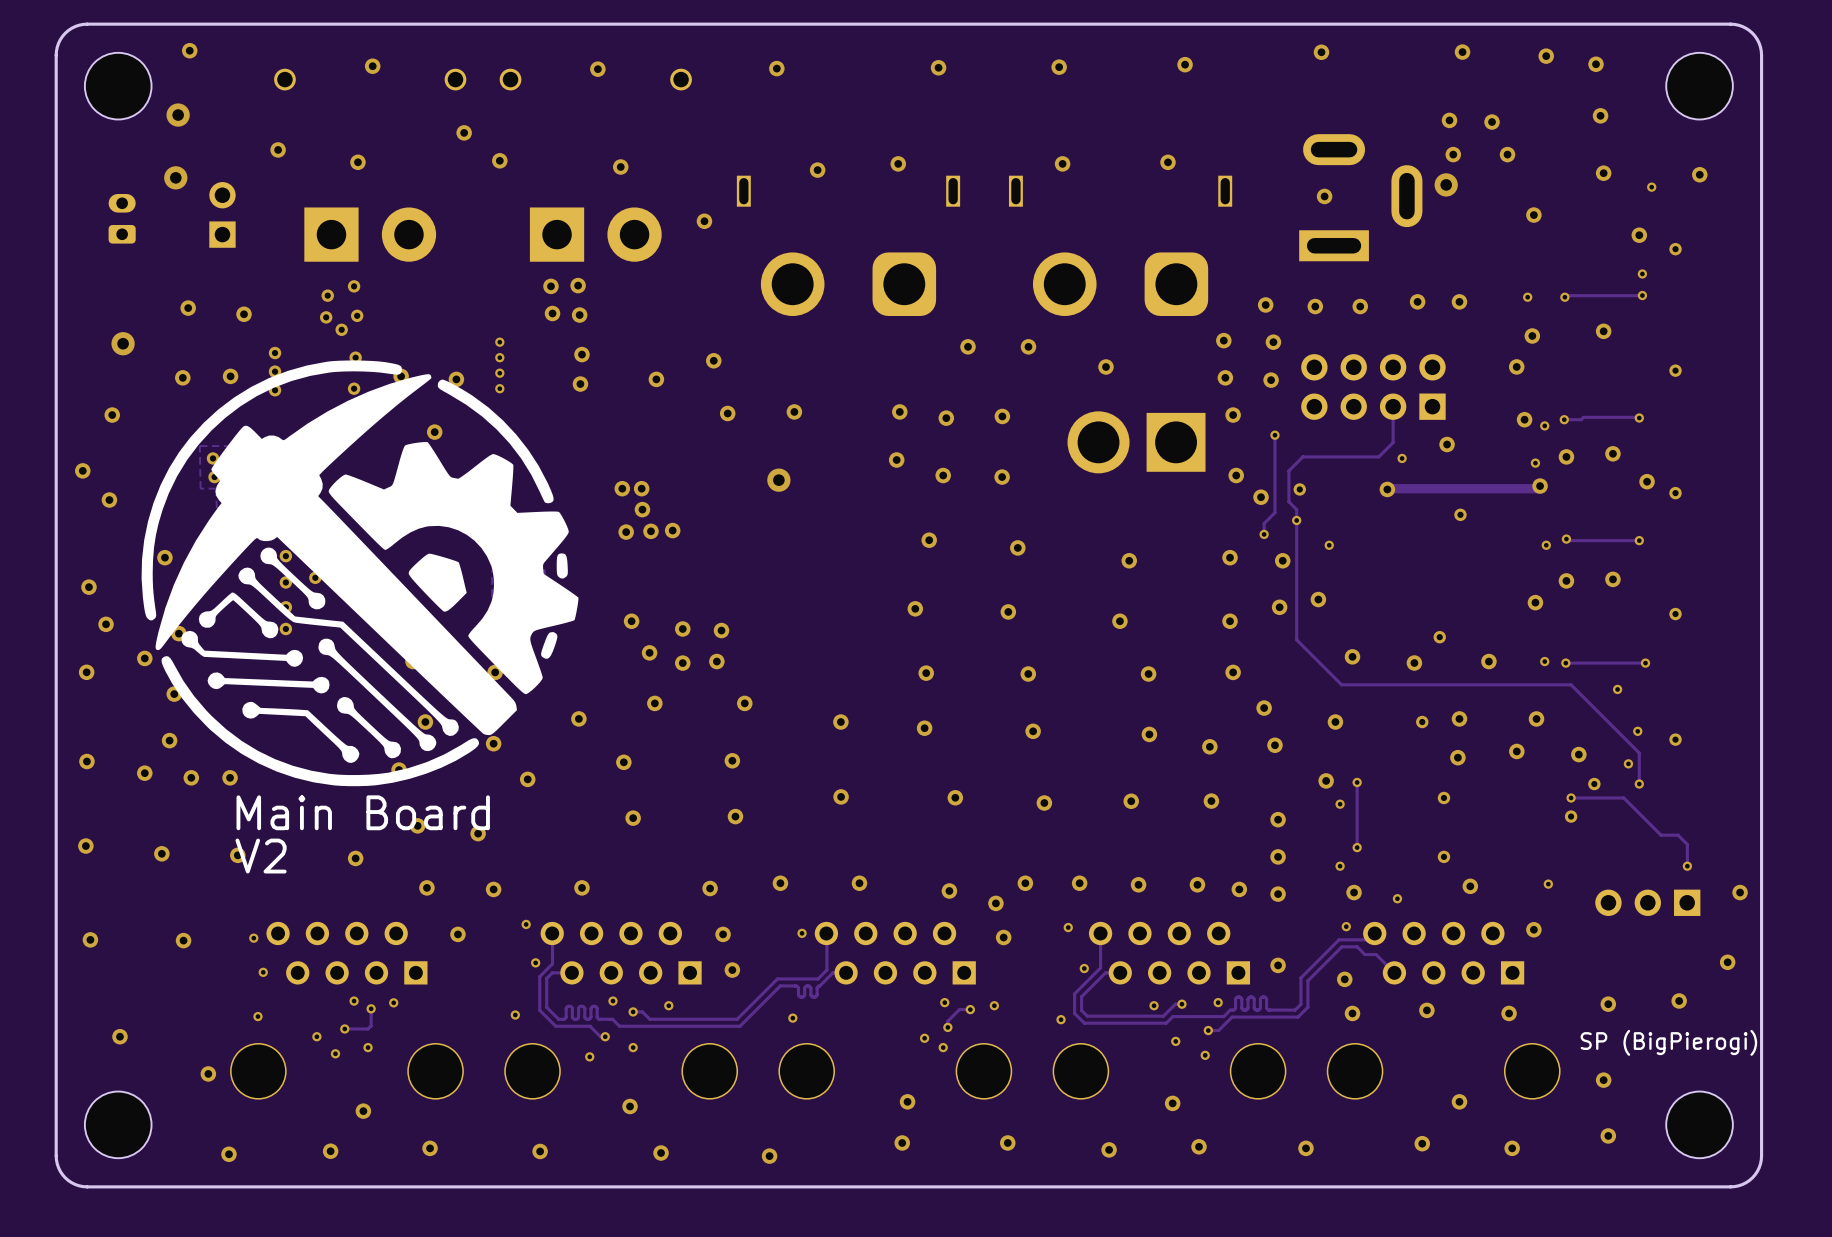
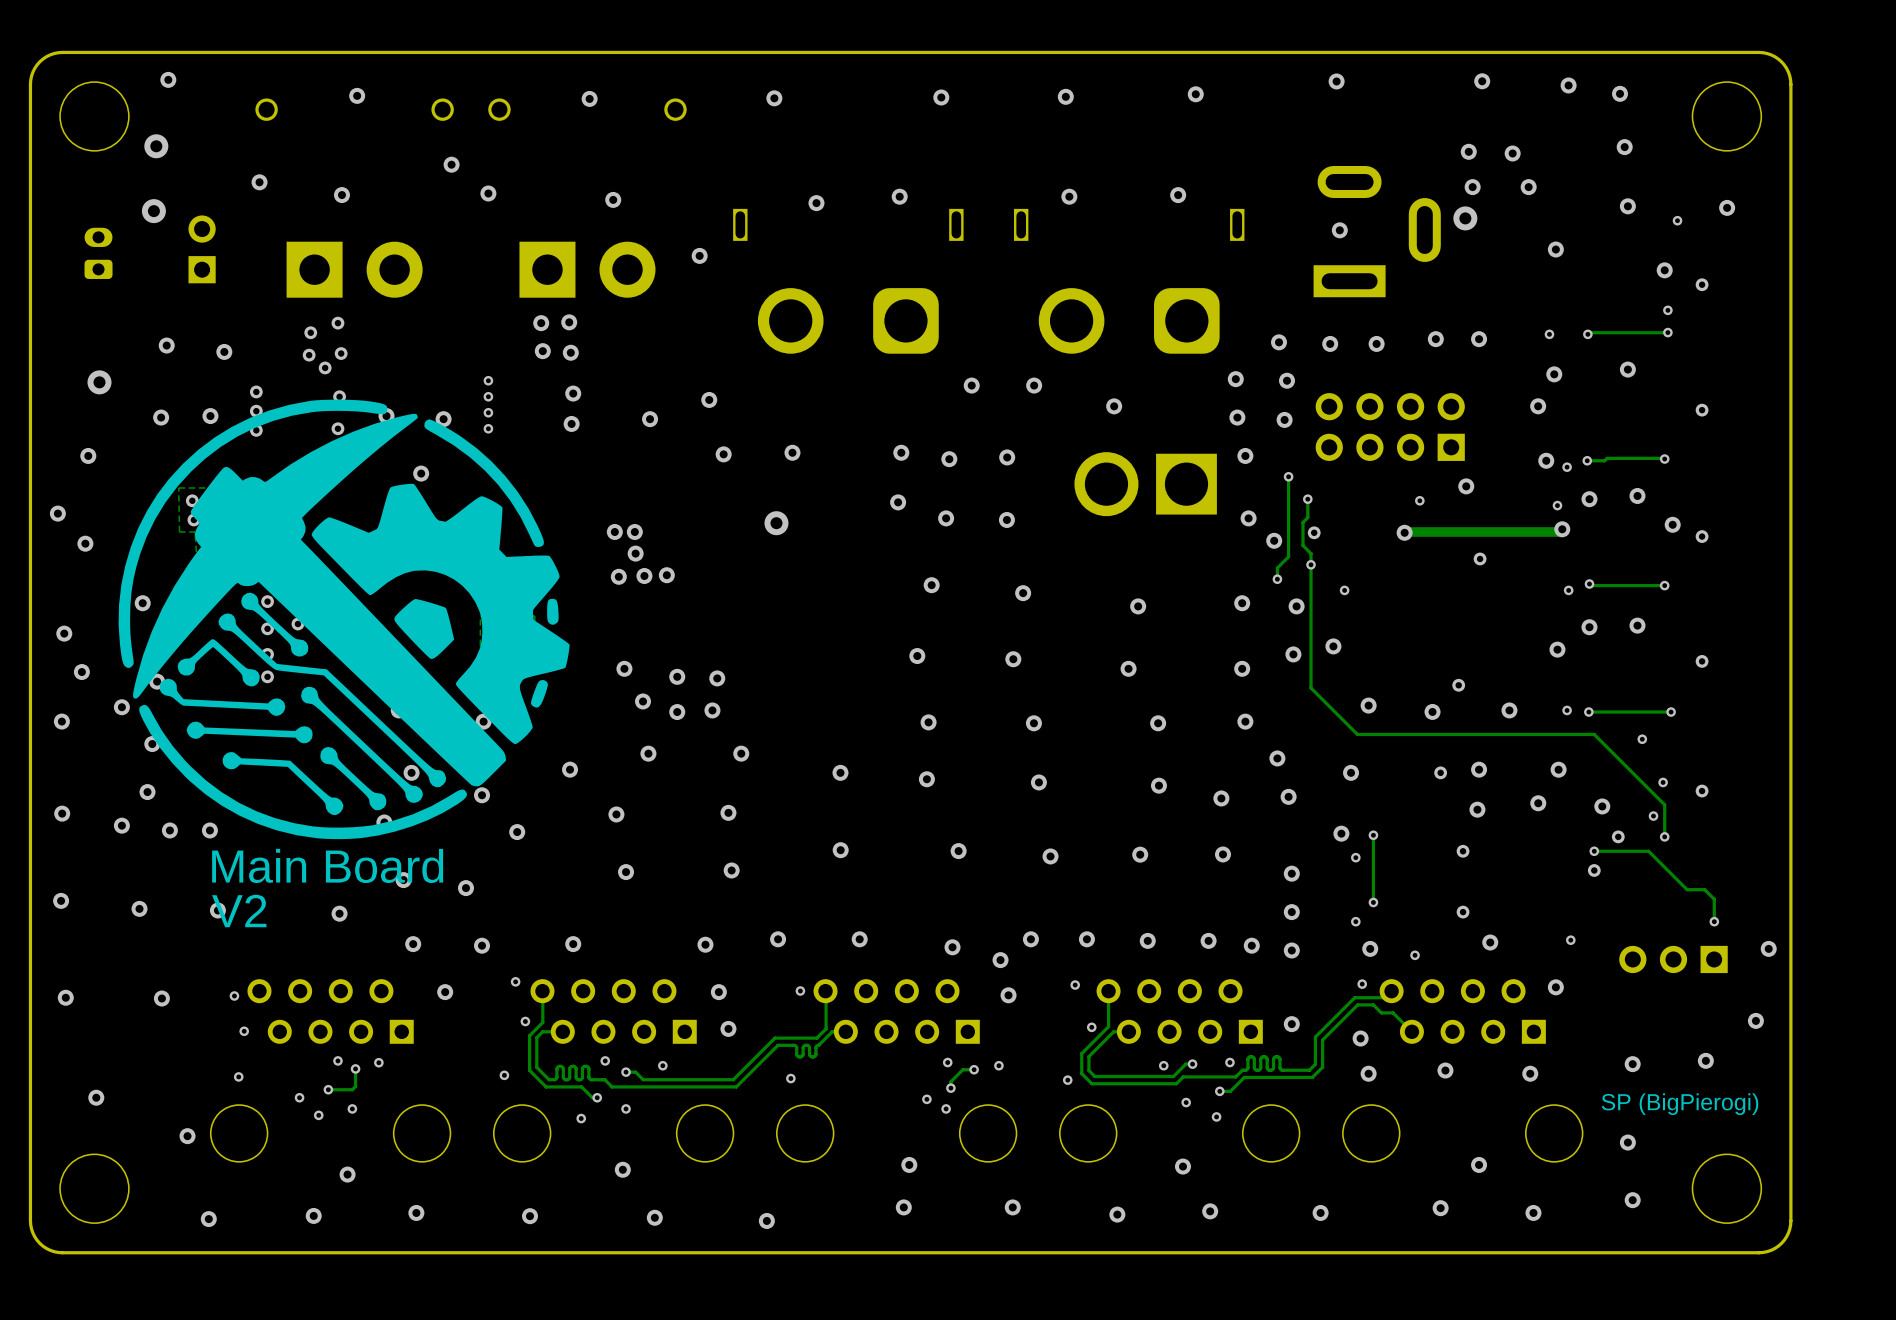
track: (1393, 406) (1393, 442) (1378, 456) (1302, 456) (1288, 470) (1288, 479) -> (1307, 499) (1307, 517) (1303, 522)
via: none -> (1307, 499)

